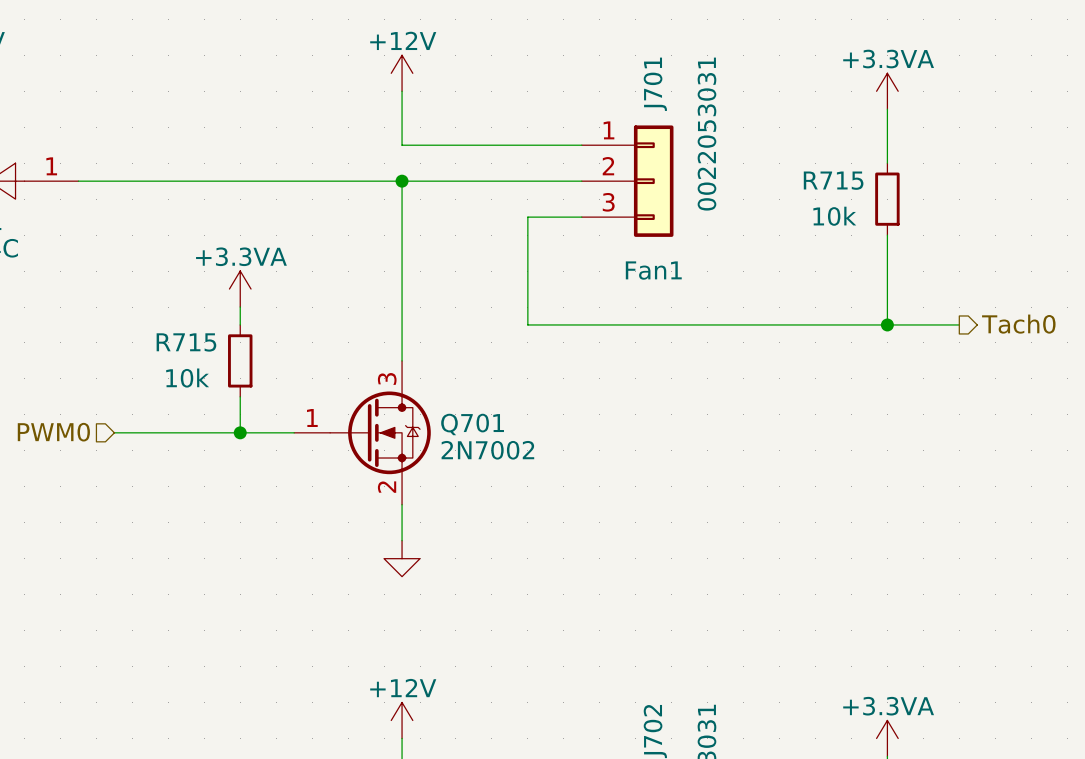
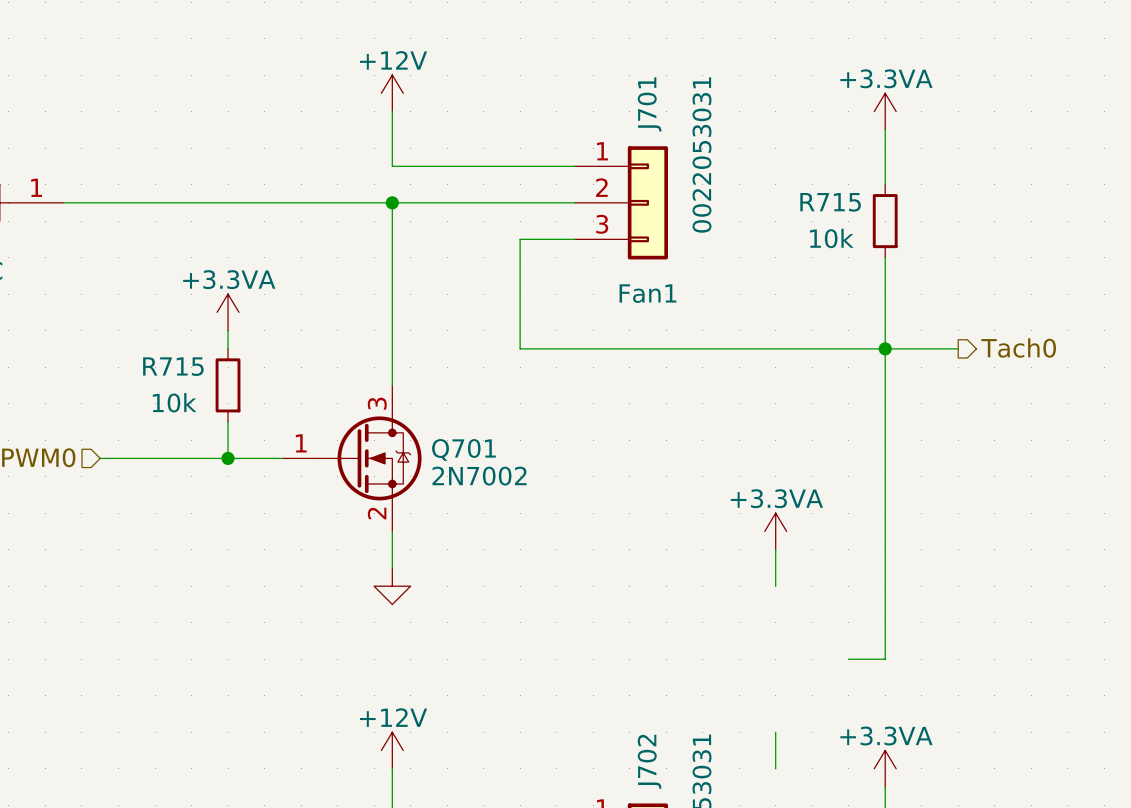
wire: none -> (885, 348) (885, 659) (848, 659)
power symbol: none -> +3.3VA (775, 531)
wire: none -> (775, 549) (775, 586)
wire: none -> (775, 732) (775, 768)

